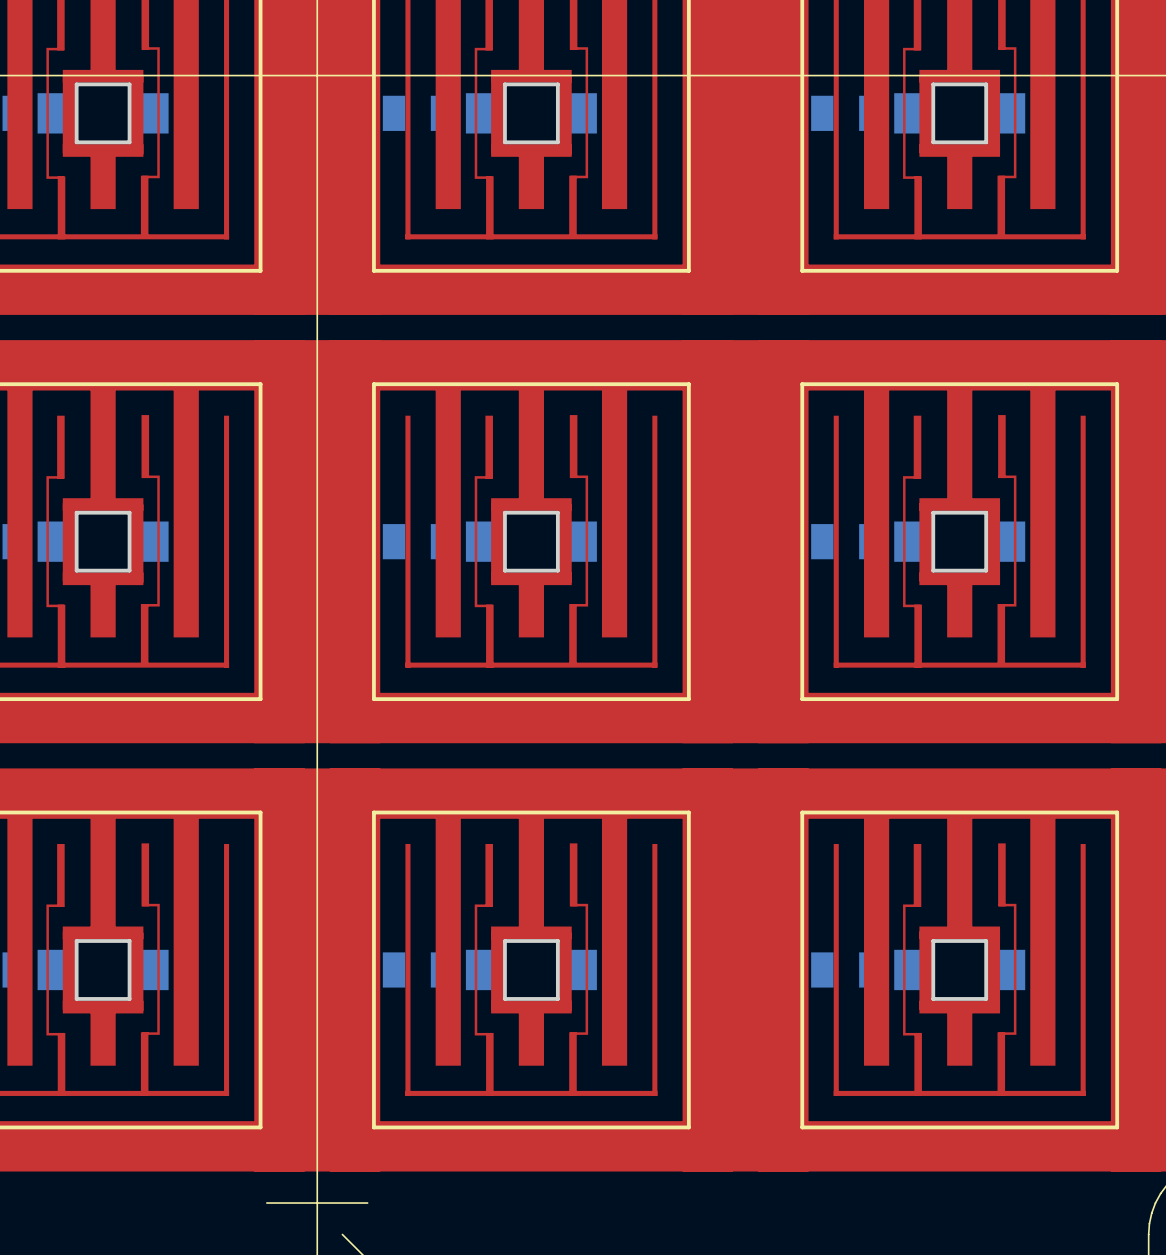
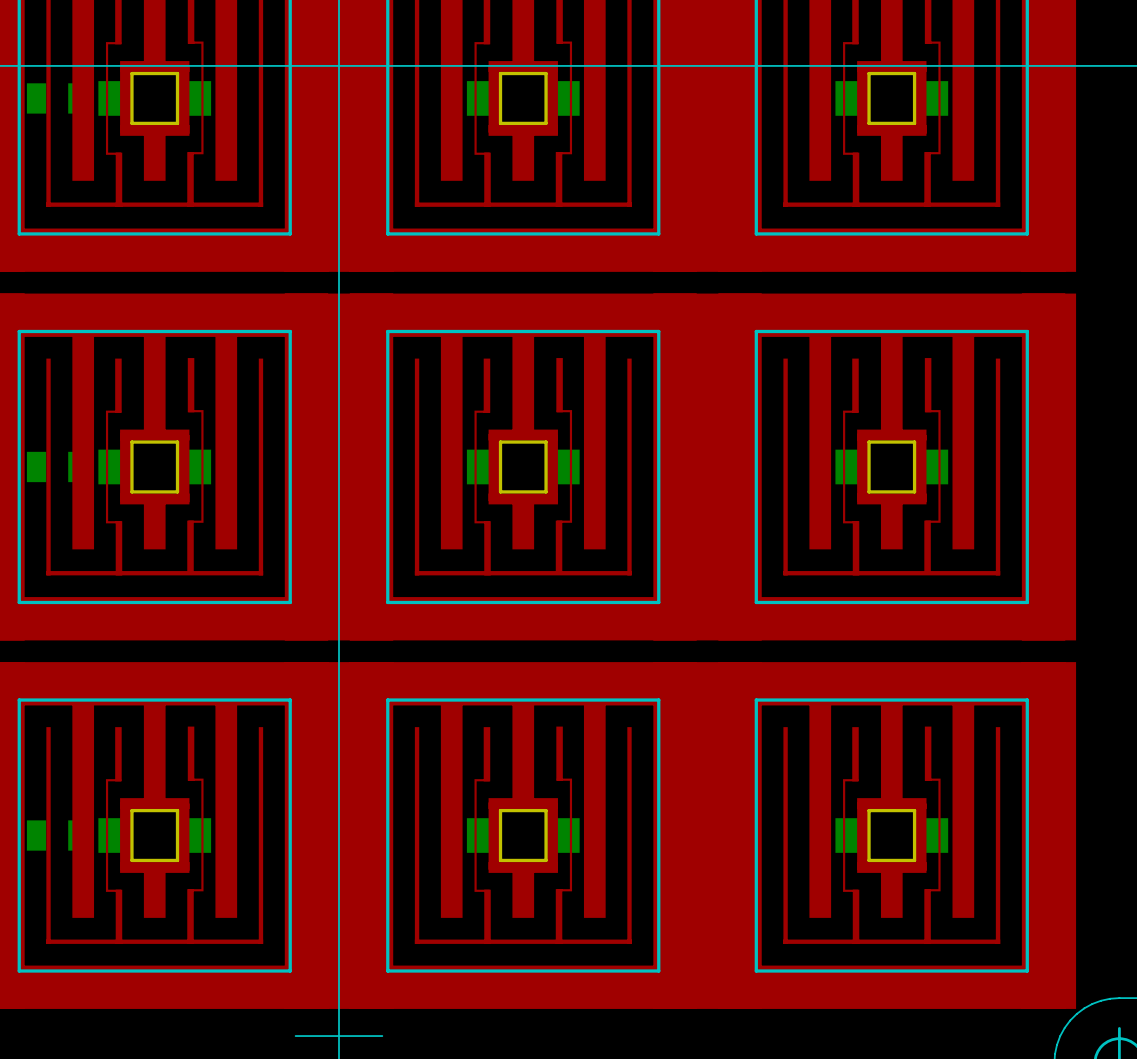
part: (418, 113) -> none
part: (846, 113) -> none
part: (418, 541) -> none
part: (846, 541) -> none
part: (418, 969) -> none
part: (846, 969) -> none

